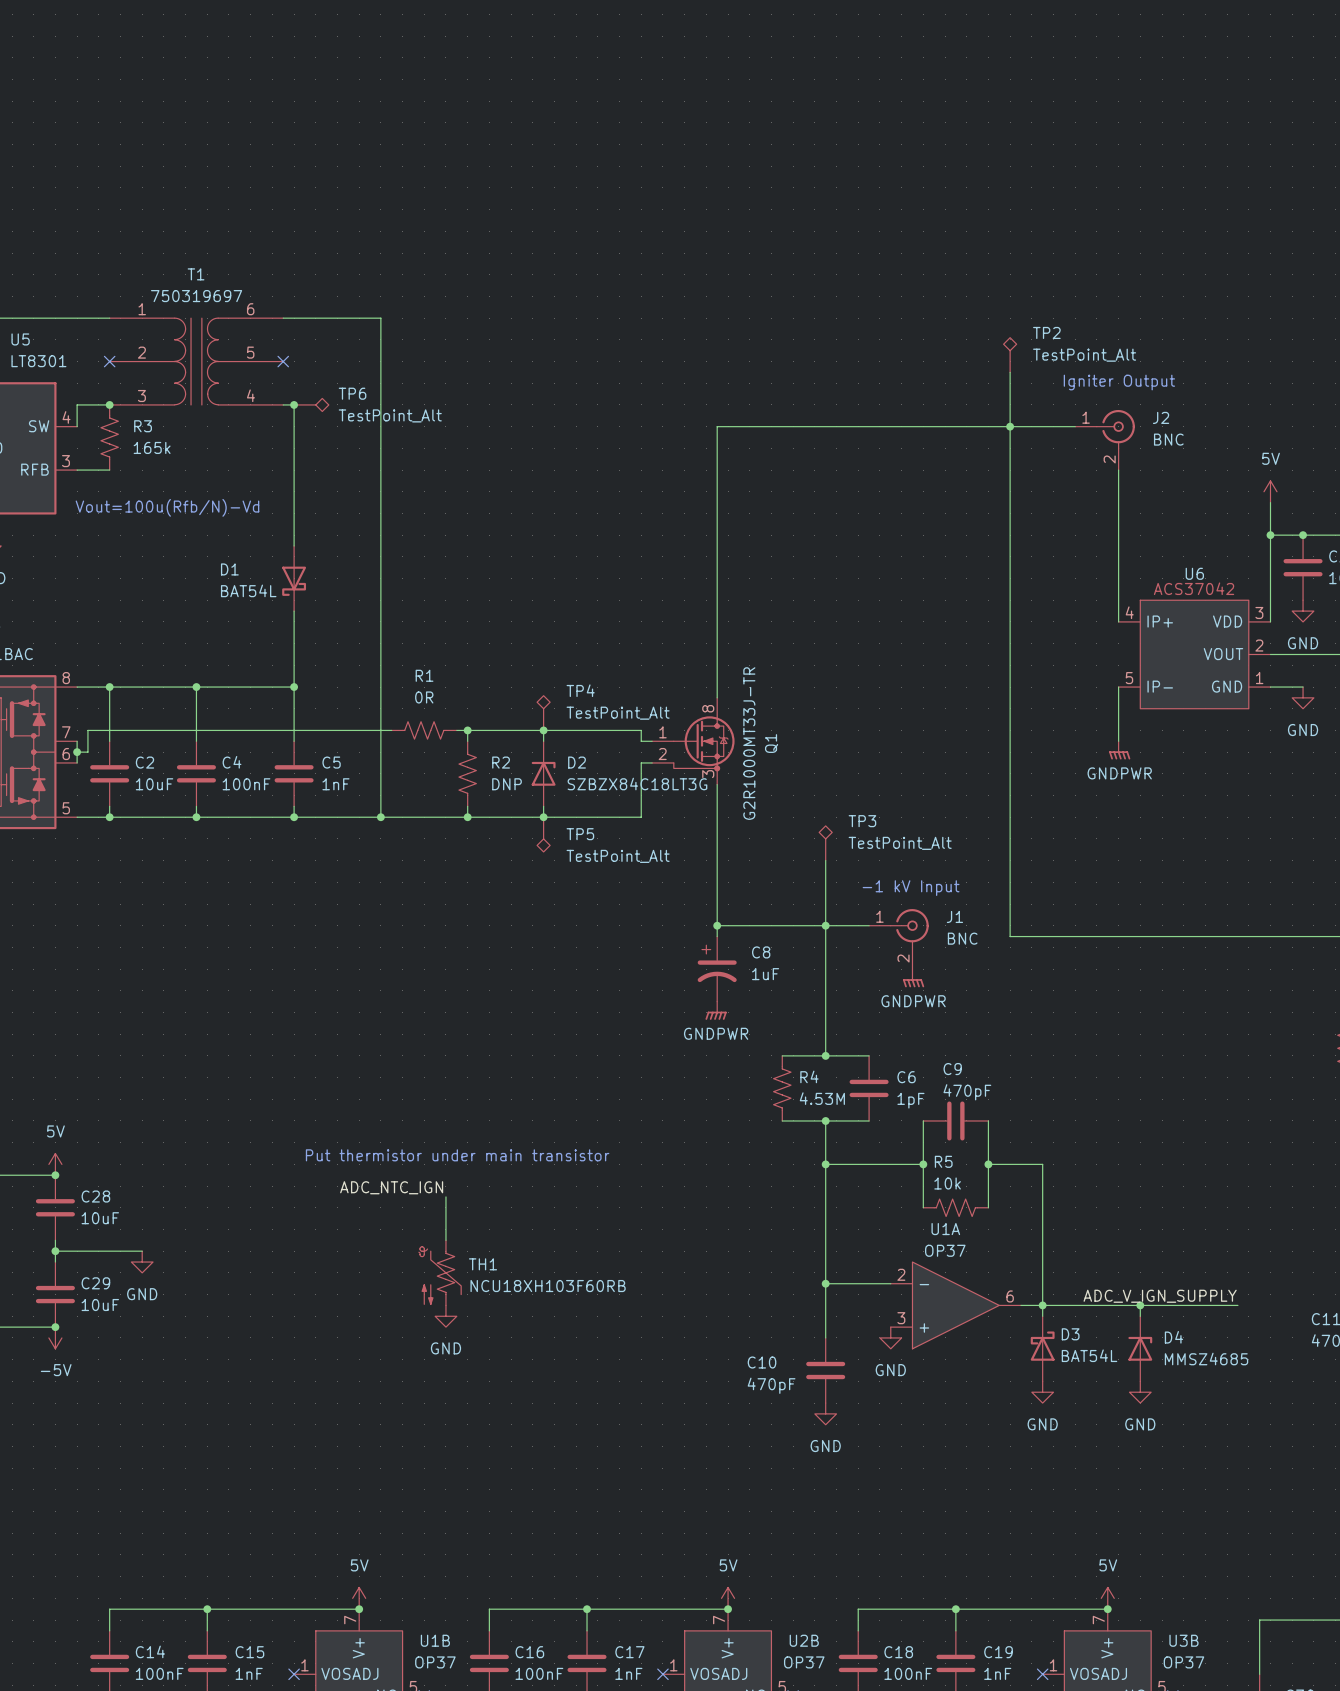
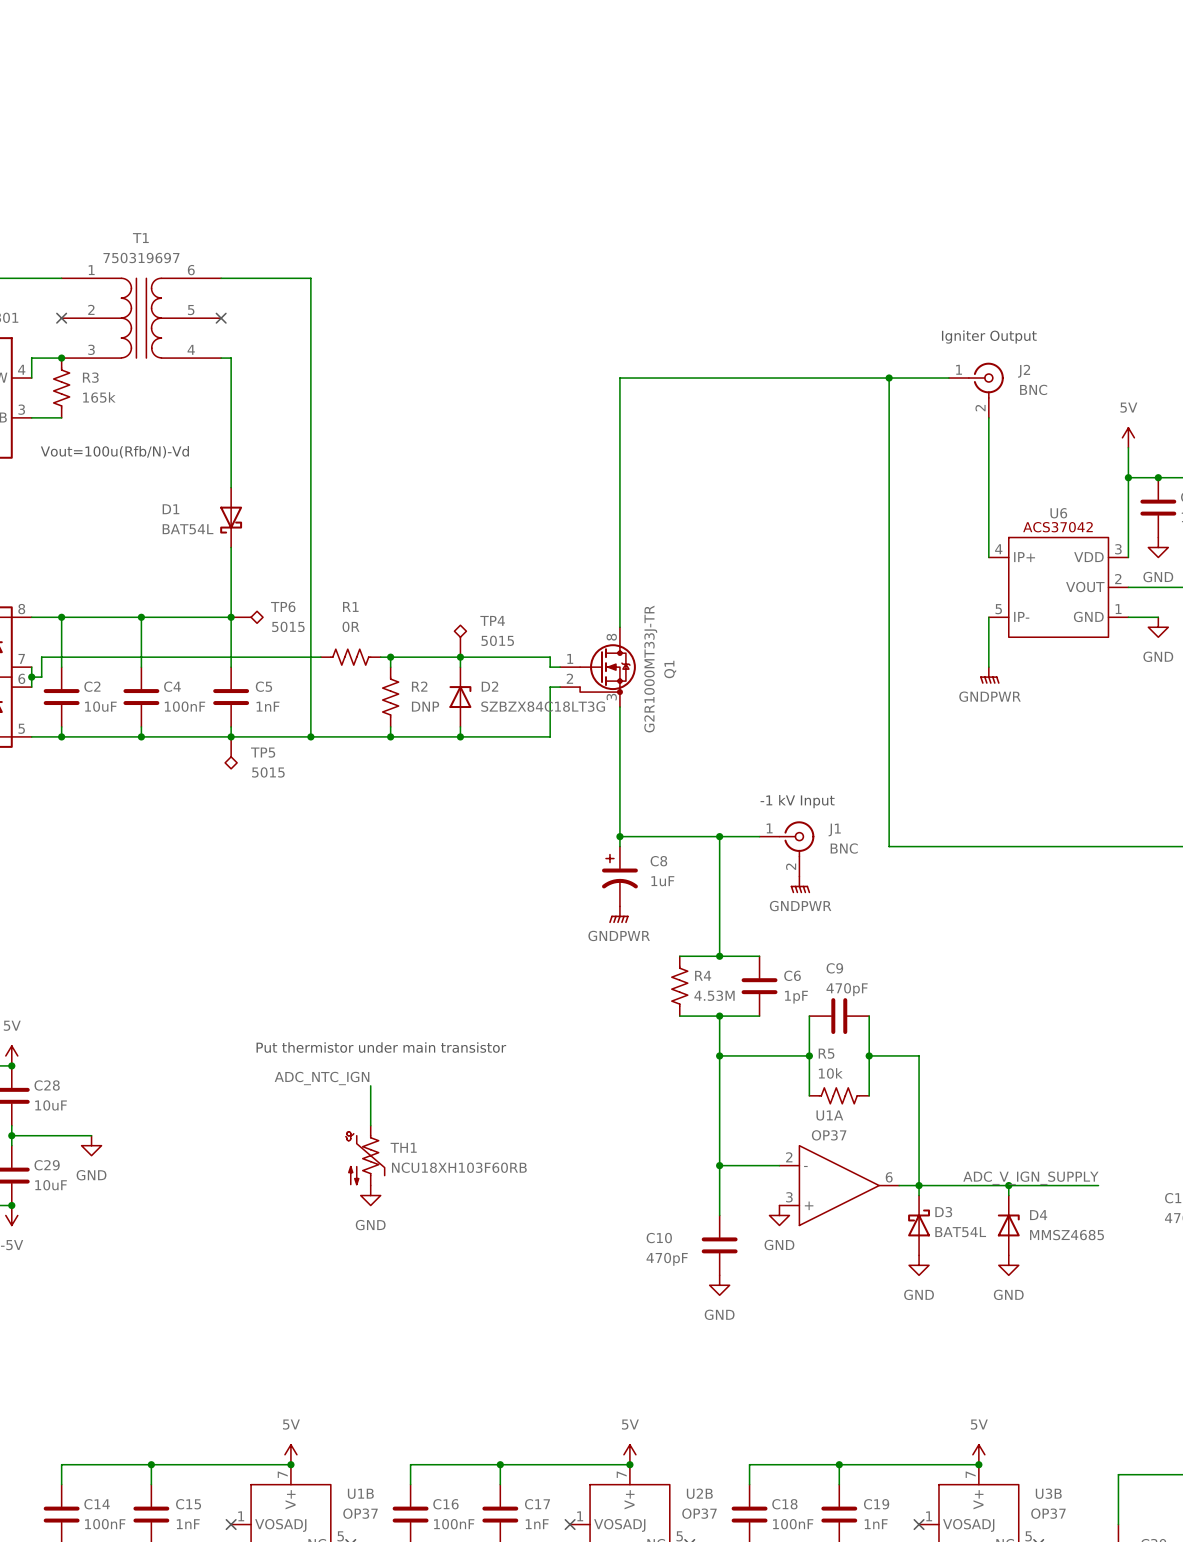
TP2: TestPoint_Alt (1010, 355) -> none
wire: (1010, 372) (1010, 426) -> none
junction: (294, 404) -> none
TP6 position: (311, 404) -> (247, 617)
TP6 value: TestPoint_Alt (390, 415) -> 5015 (288, 626)
TP4 value: TestPoint_Alt (618, 713) -> 5015 (497, 640)
TP5 position: (543, 834) -> (231, 752)
TP3: TestPoint_Alt (825, 843) -> none
TP5 value: TestPoint_Alt (618, 856) -> 5015 (268, 772)
wire: (825, 860) (825, 925) -> none

